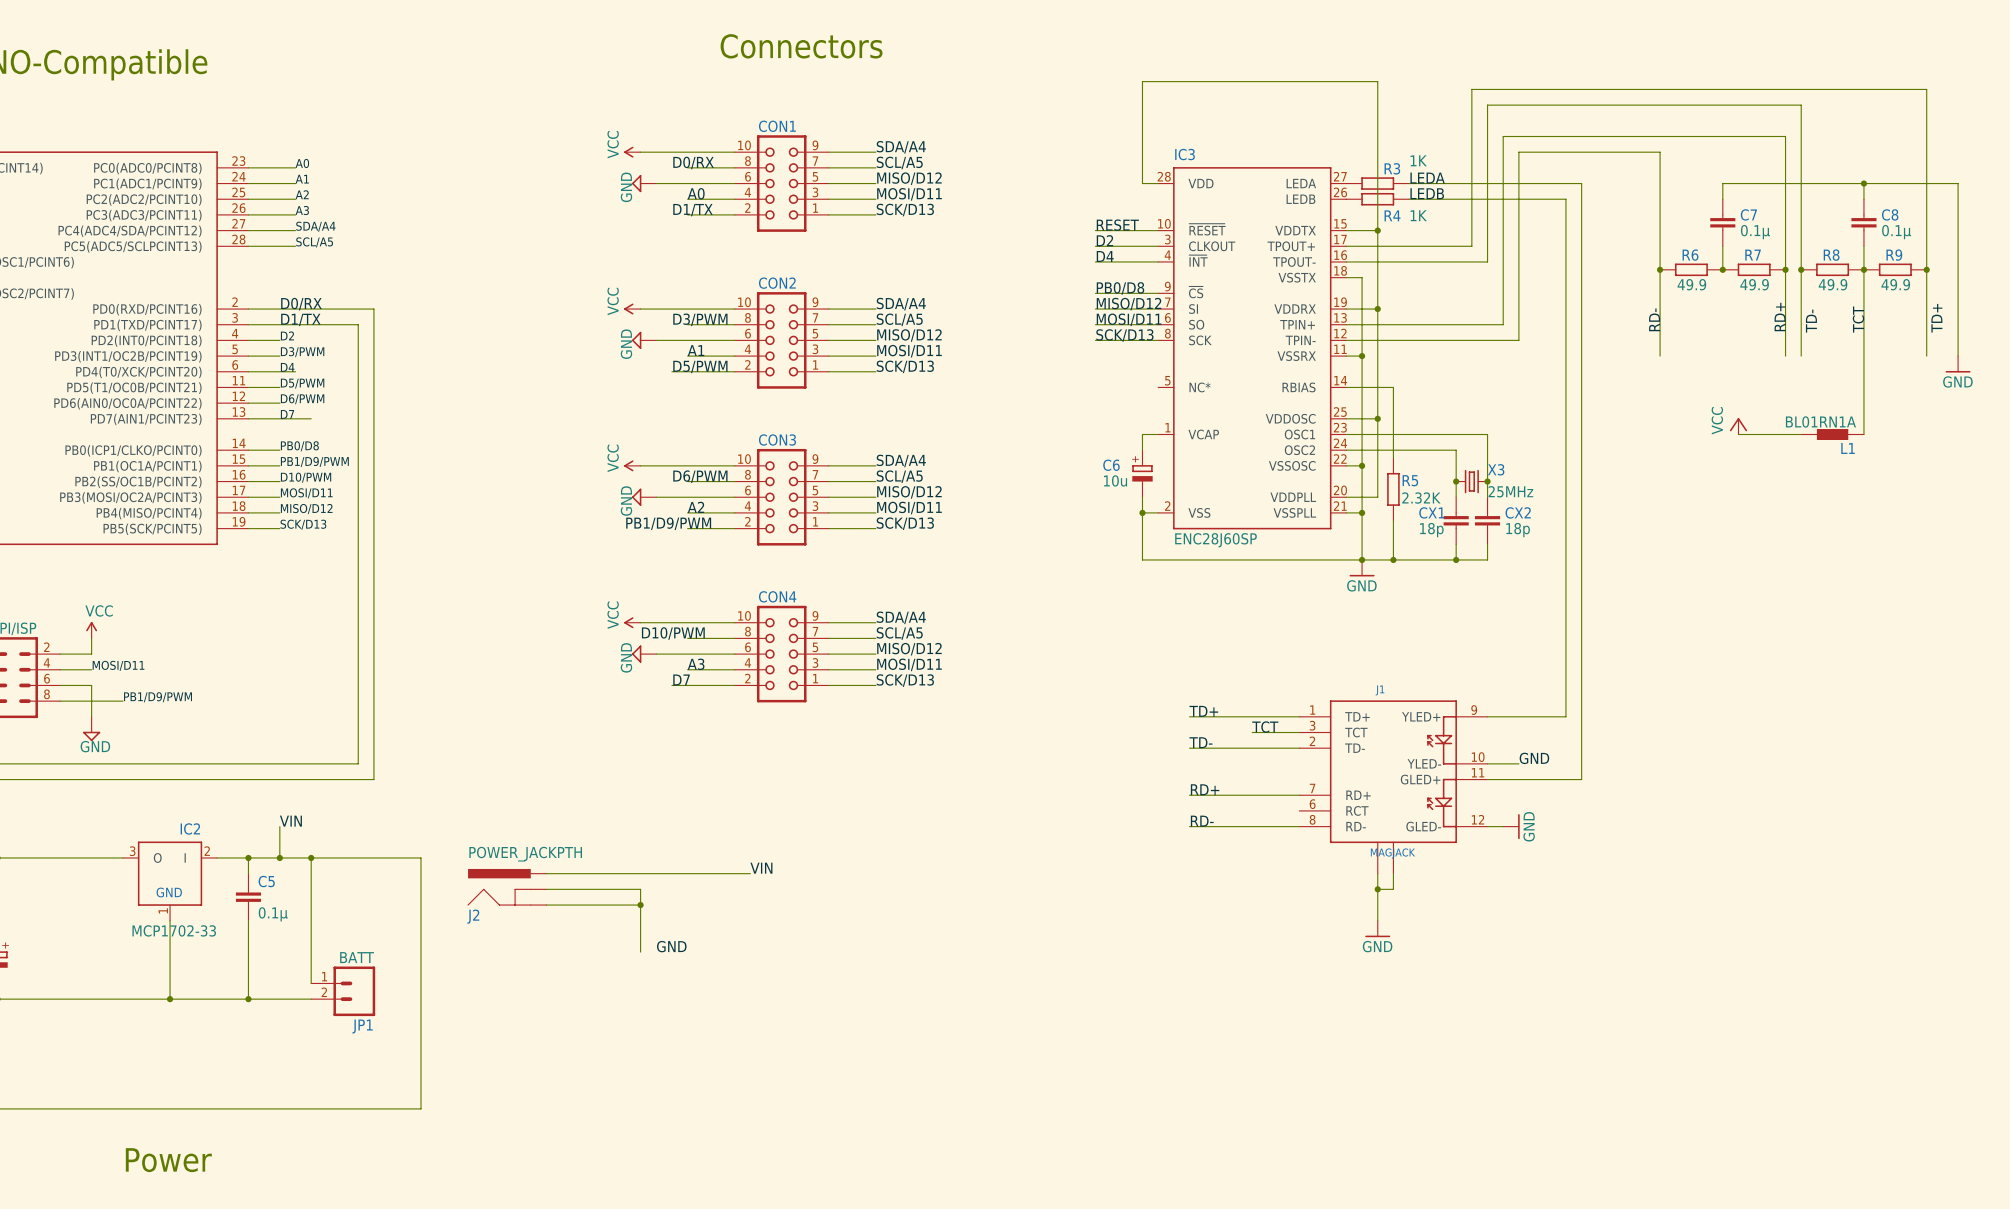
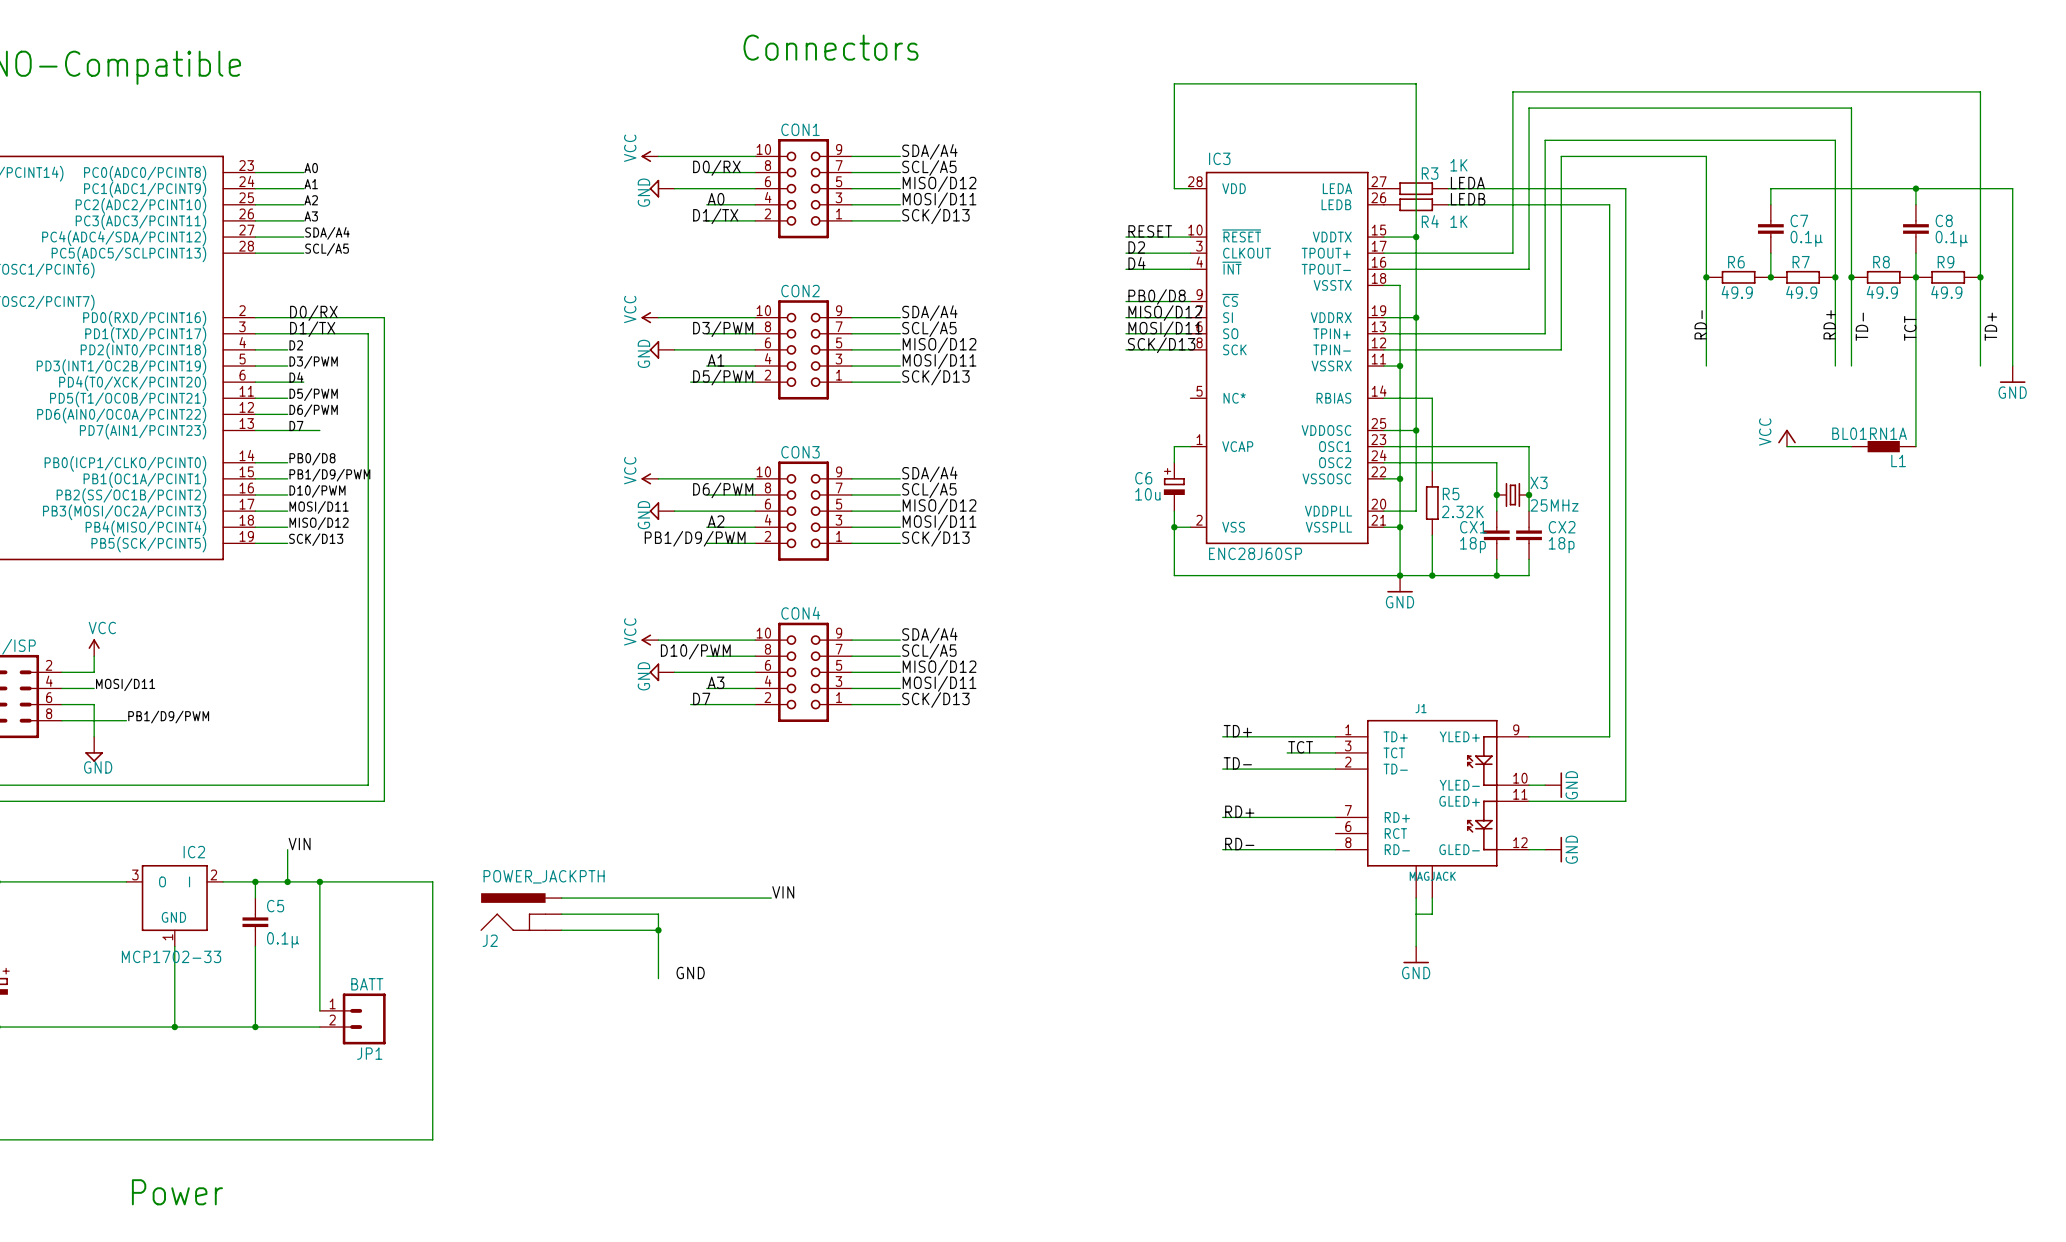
label: GND (1534, 758) -> none
power symbol: none -> GND (1553, 785)
junction: (1377, 889) -> none

